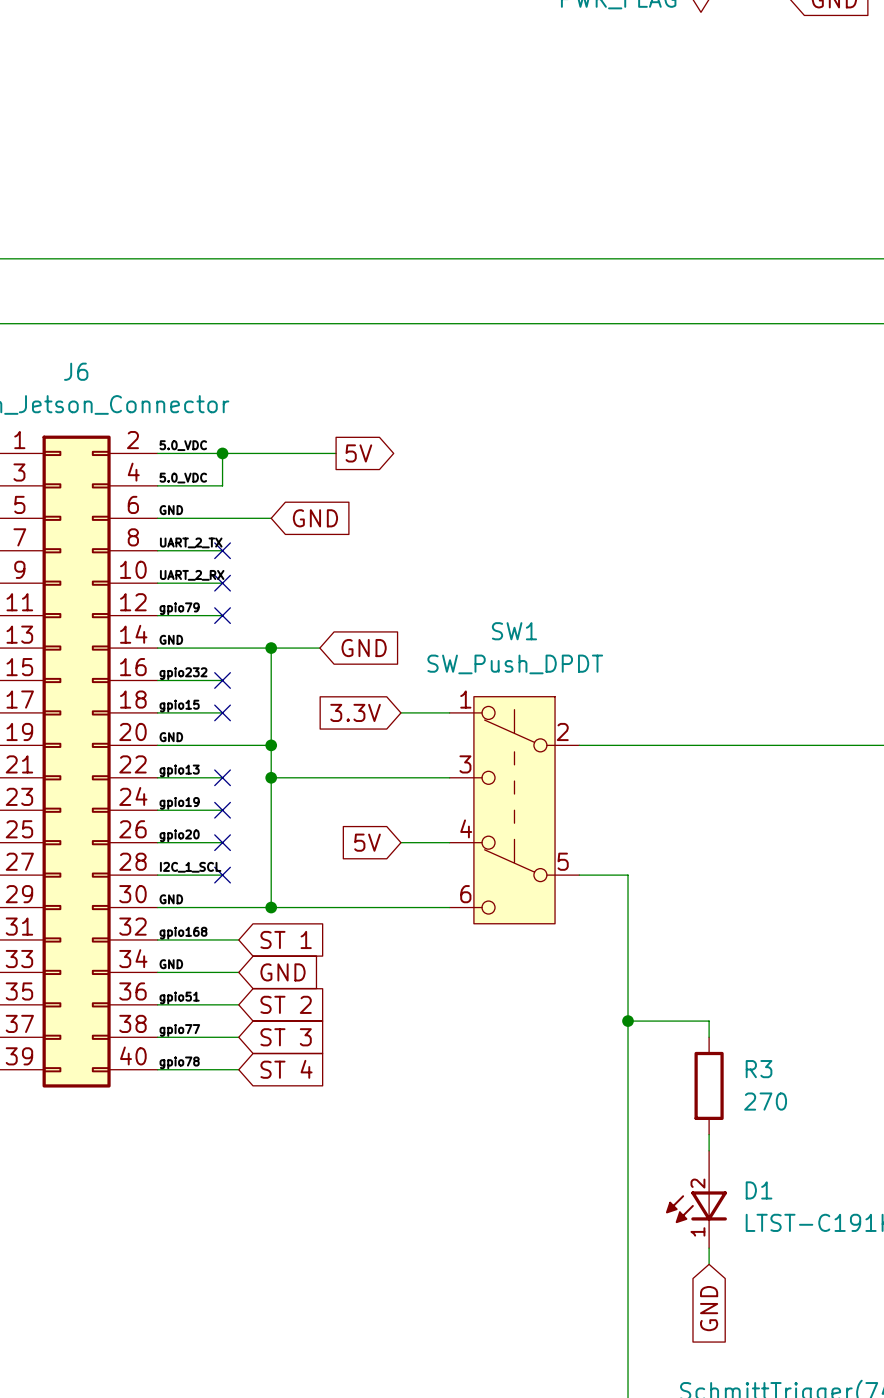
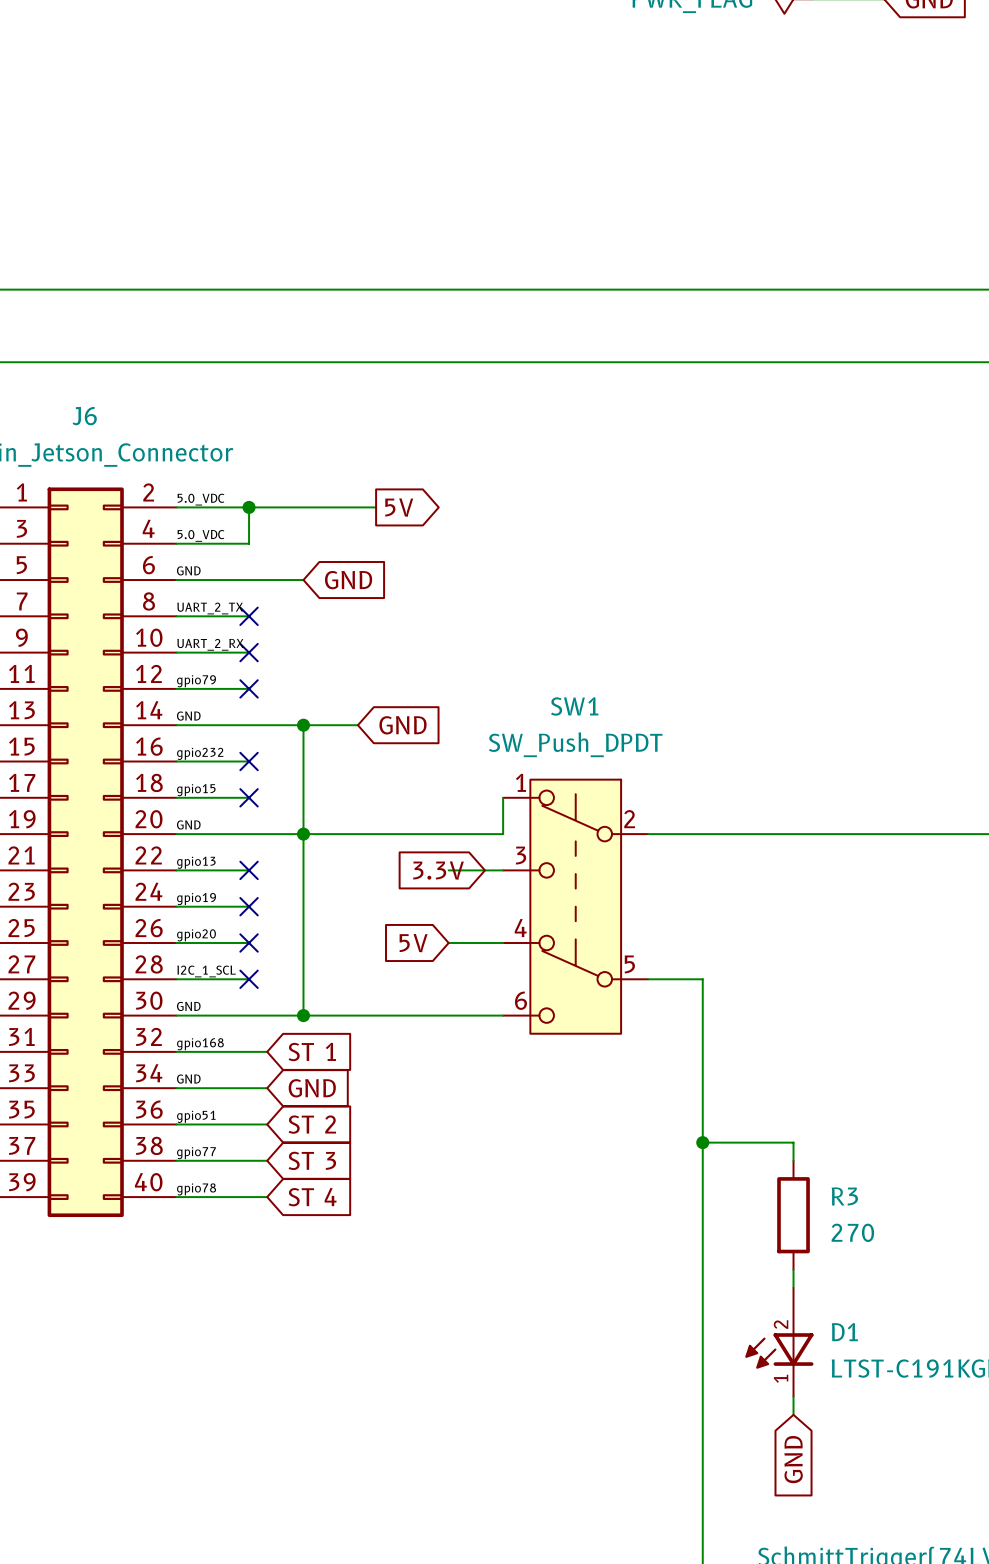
global label position: 3.3V (355, 712) -> 3.3V (438, 870)
wire: (400, 712) (449, 712) -> (303, 834) (503, 834) (503, 797)
wire: (271, 777) (400, 777) -> none
junction: (271, 777) -> none

